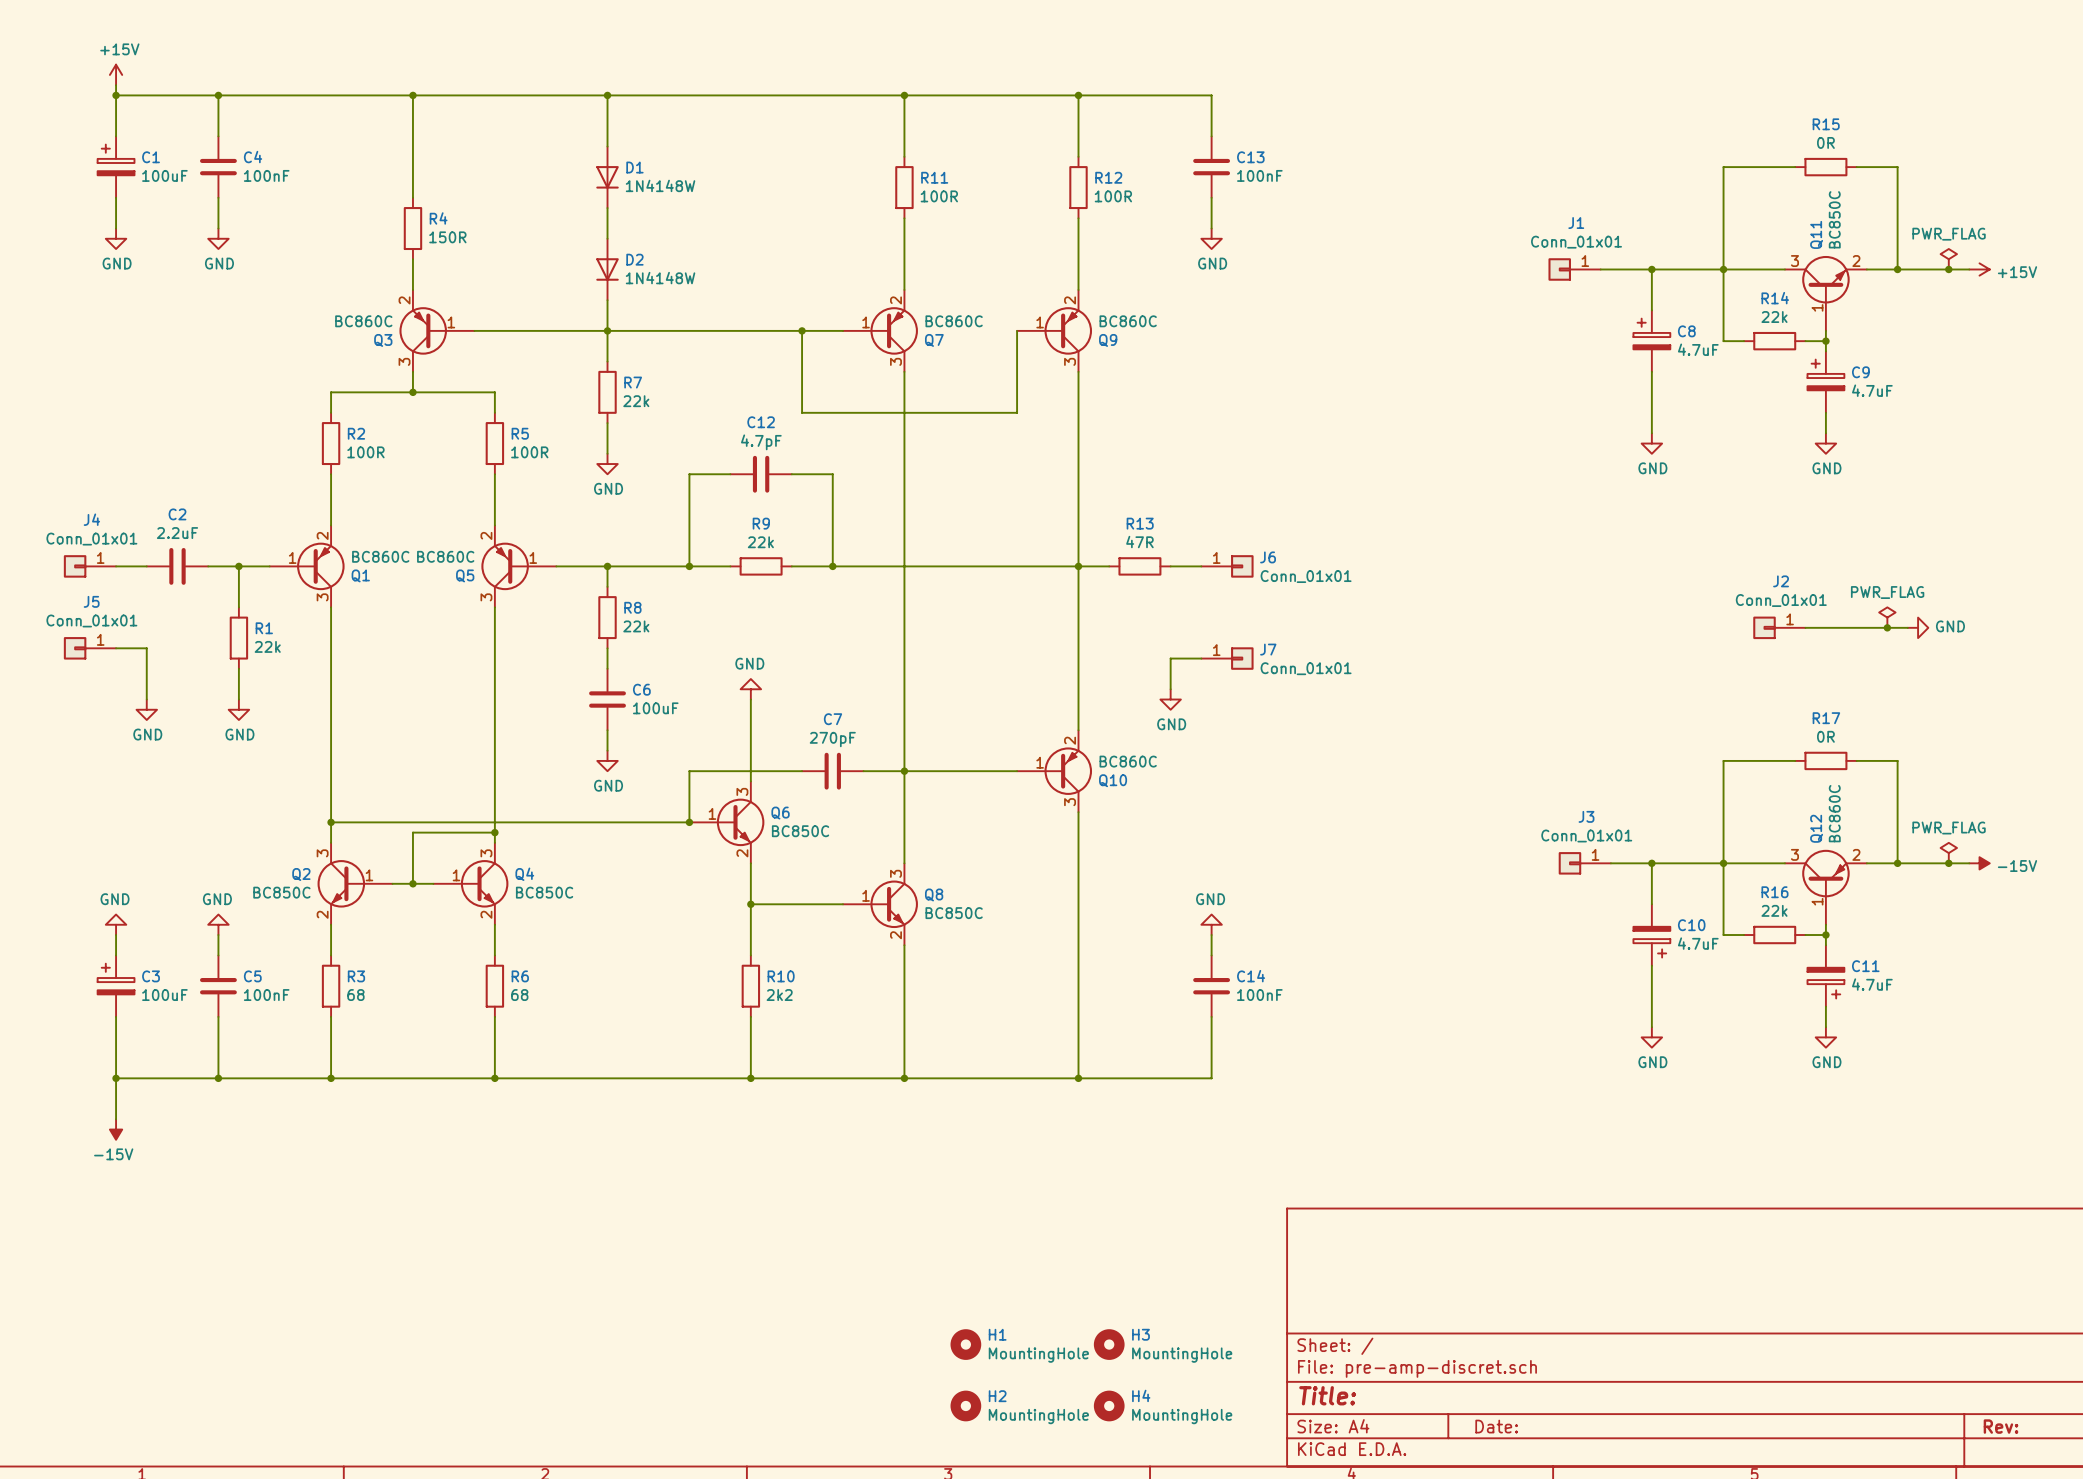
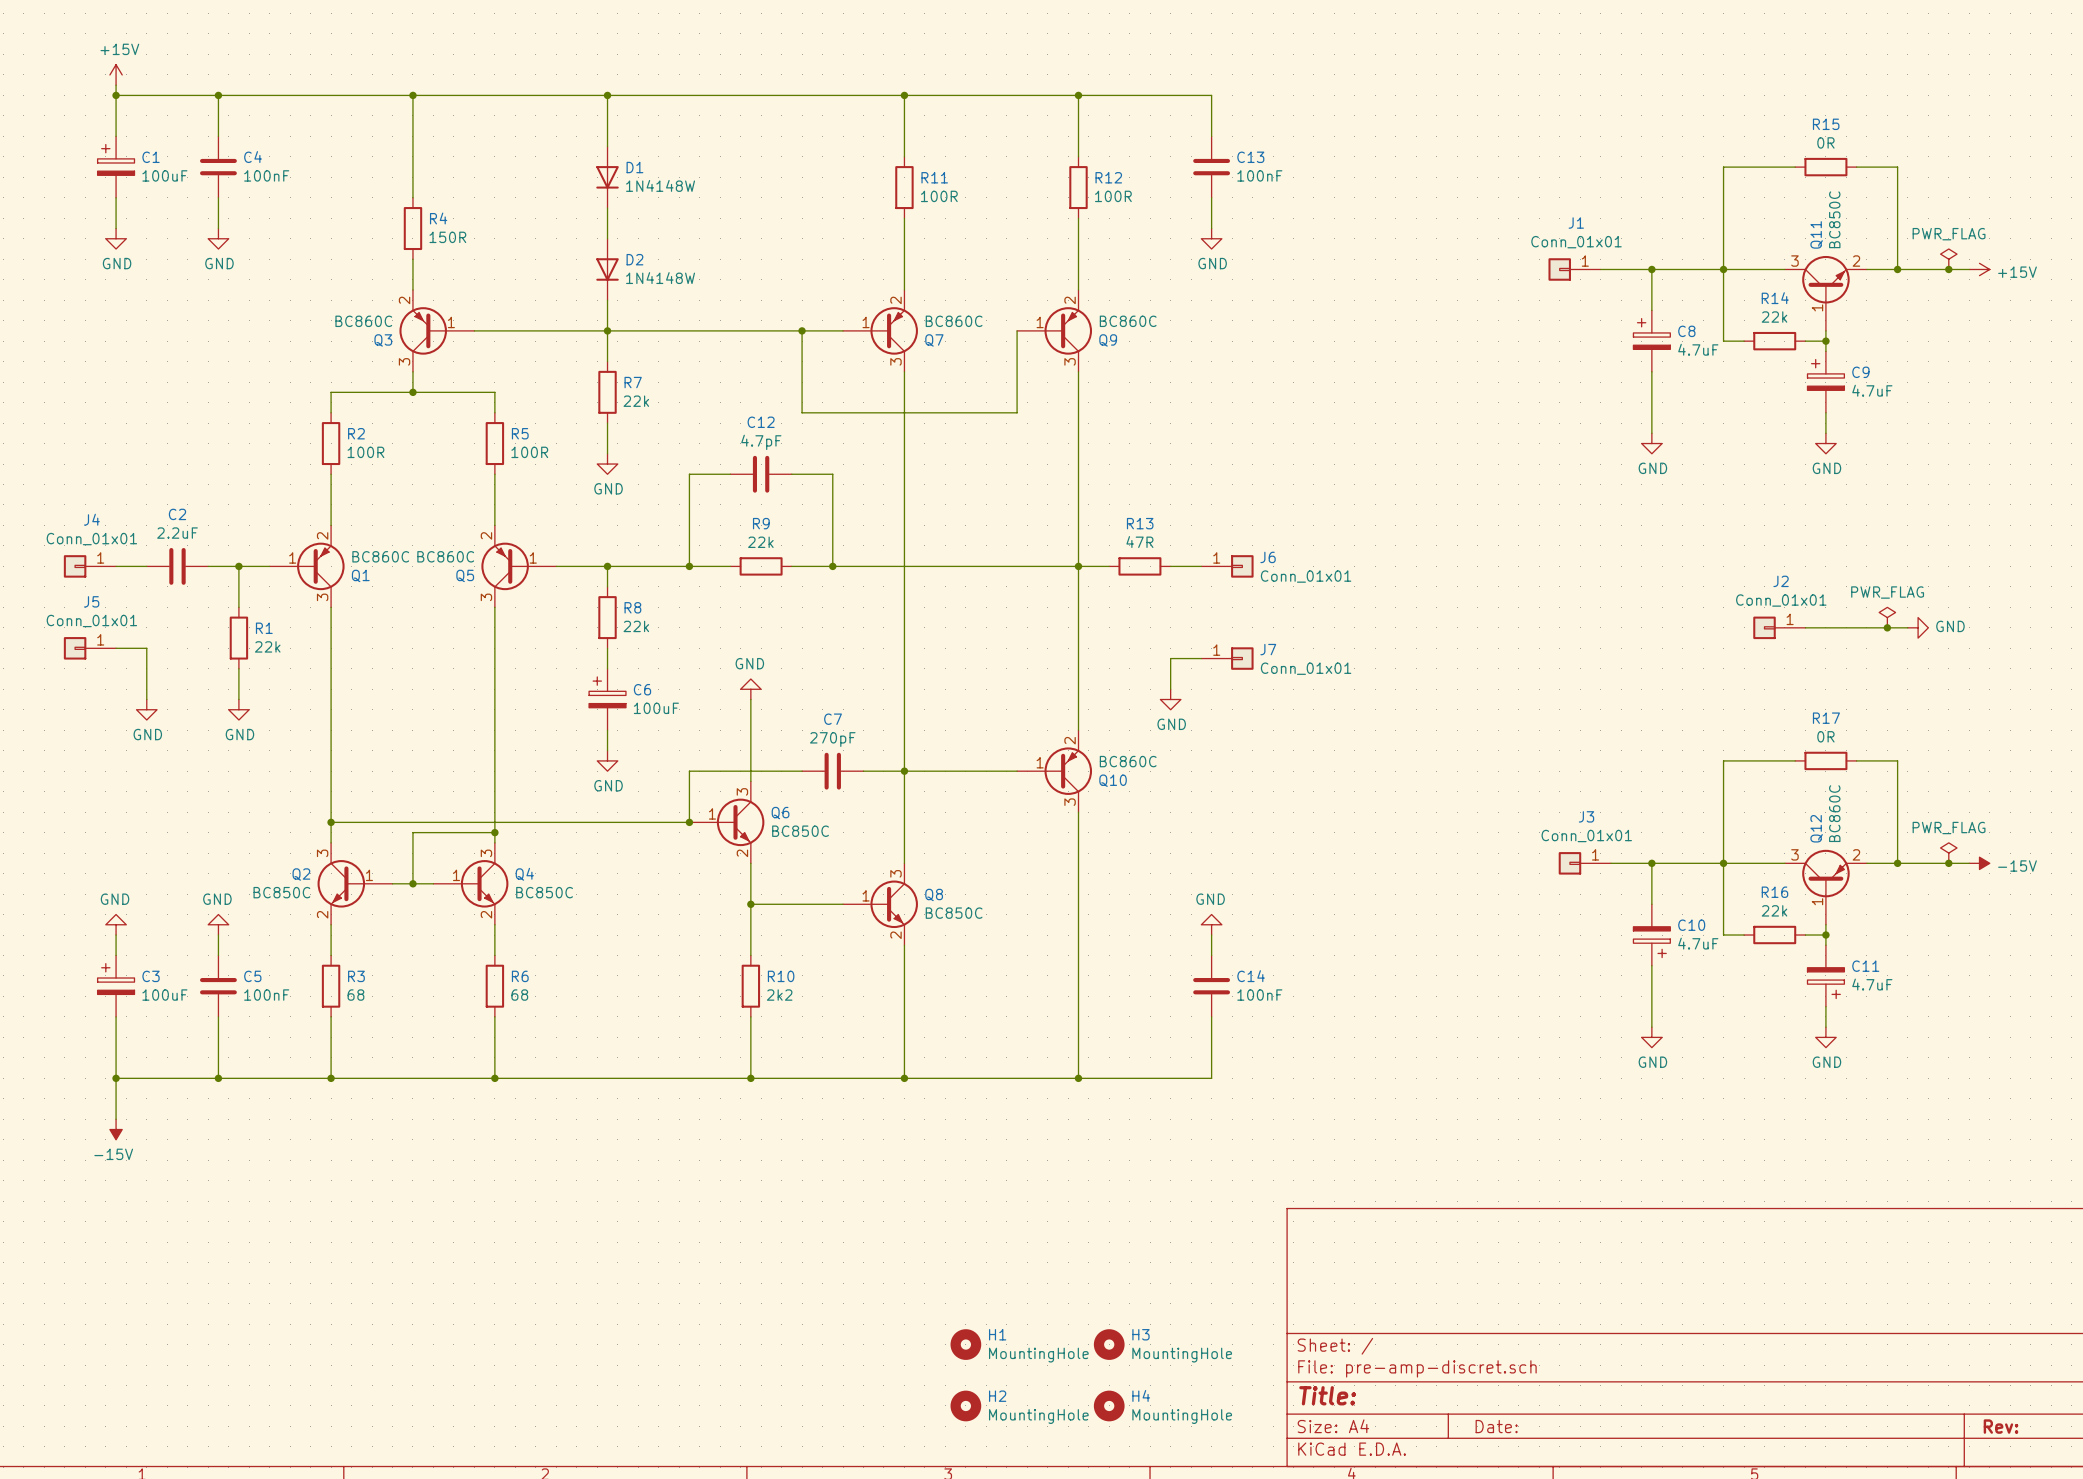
C6 symbol: [589, 668, 626, 731] -> [589, 668, 626, 731]

